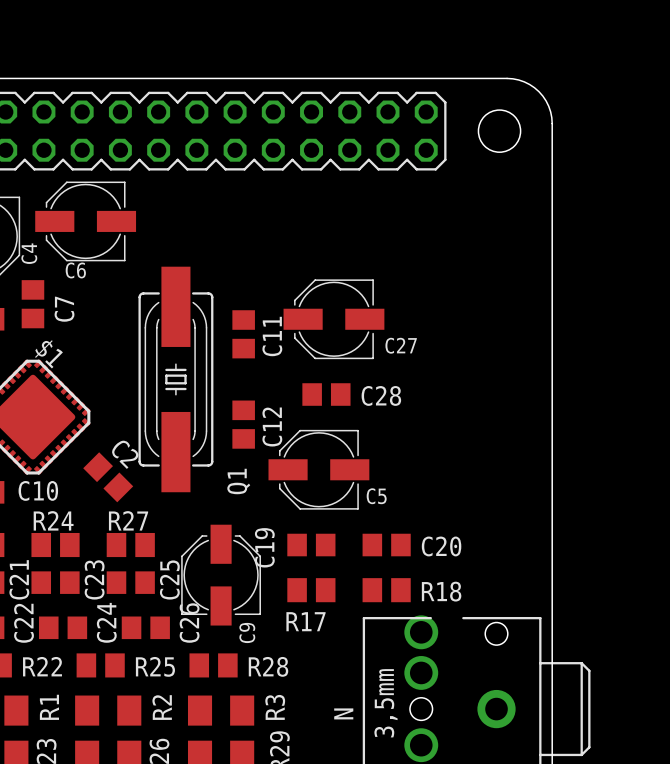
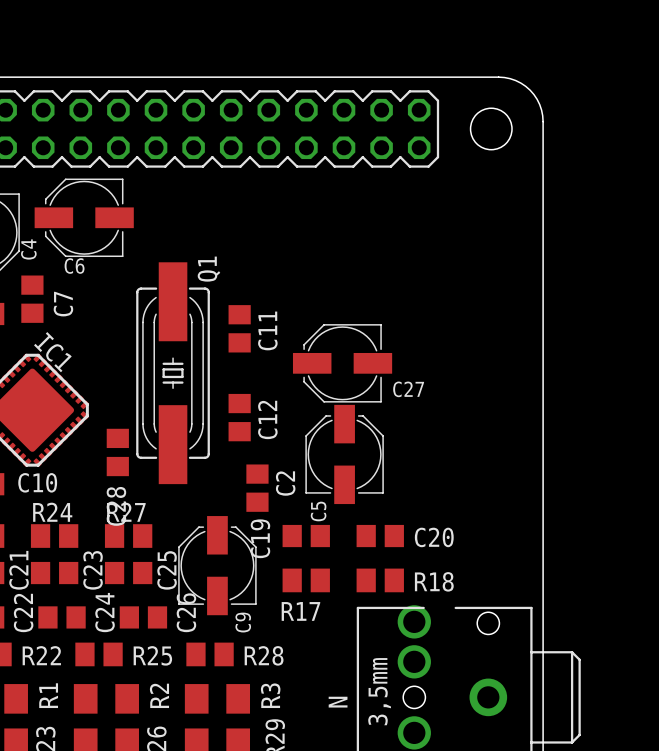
C27 position: (333, 319) -> (342, 363)
$1 name: $1 (48, 354) -> IC1 (52, 352)
C28 rotation: 0° (326, 394) -> 90° clockwise (117, 452)
C28 position: (326, 394) -> (117, 452)
C5 rotation: 0° (318, 469) -> 90° clockwise (344, 454)
C2 rotation: 0° (108, 477) -> 45° clockwise (257, 488)
C2 position: (108, 477) -> (257, 488)
Q1 name position: Q1 (238, 481) -> Q1 (208, 269)

